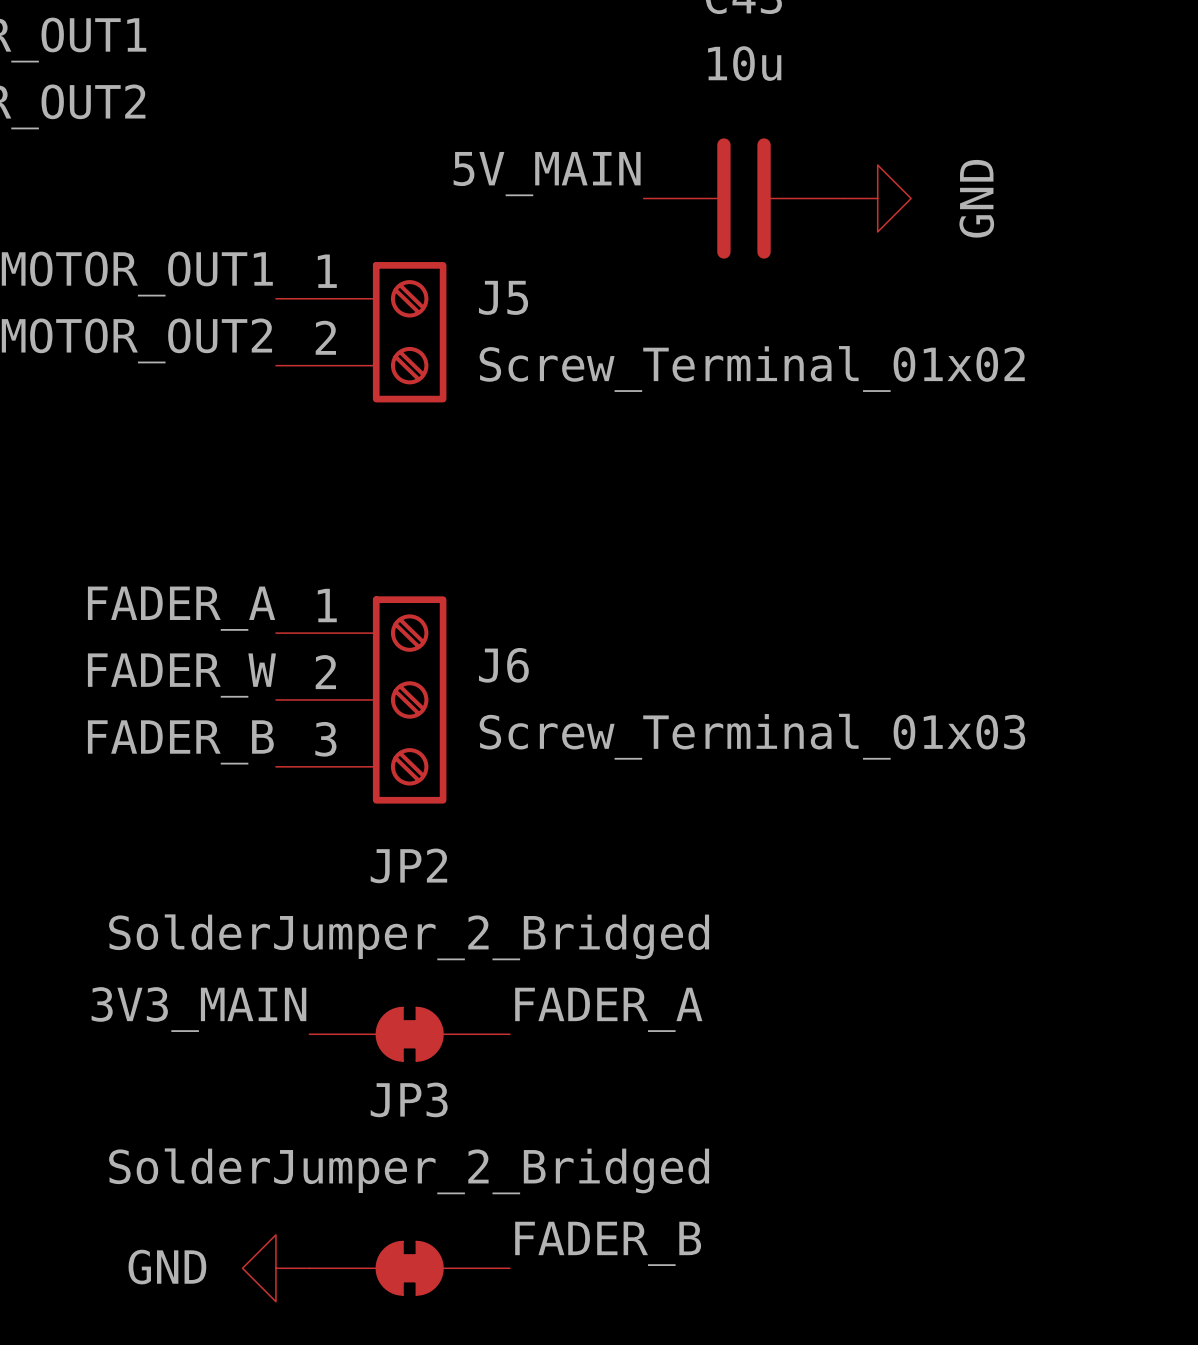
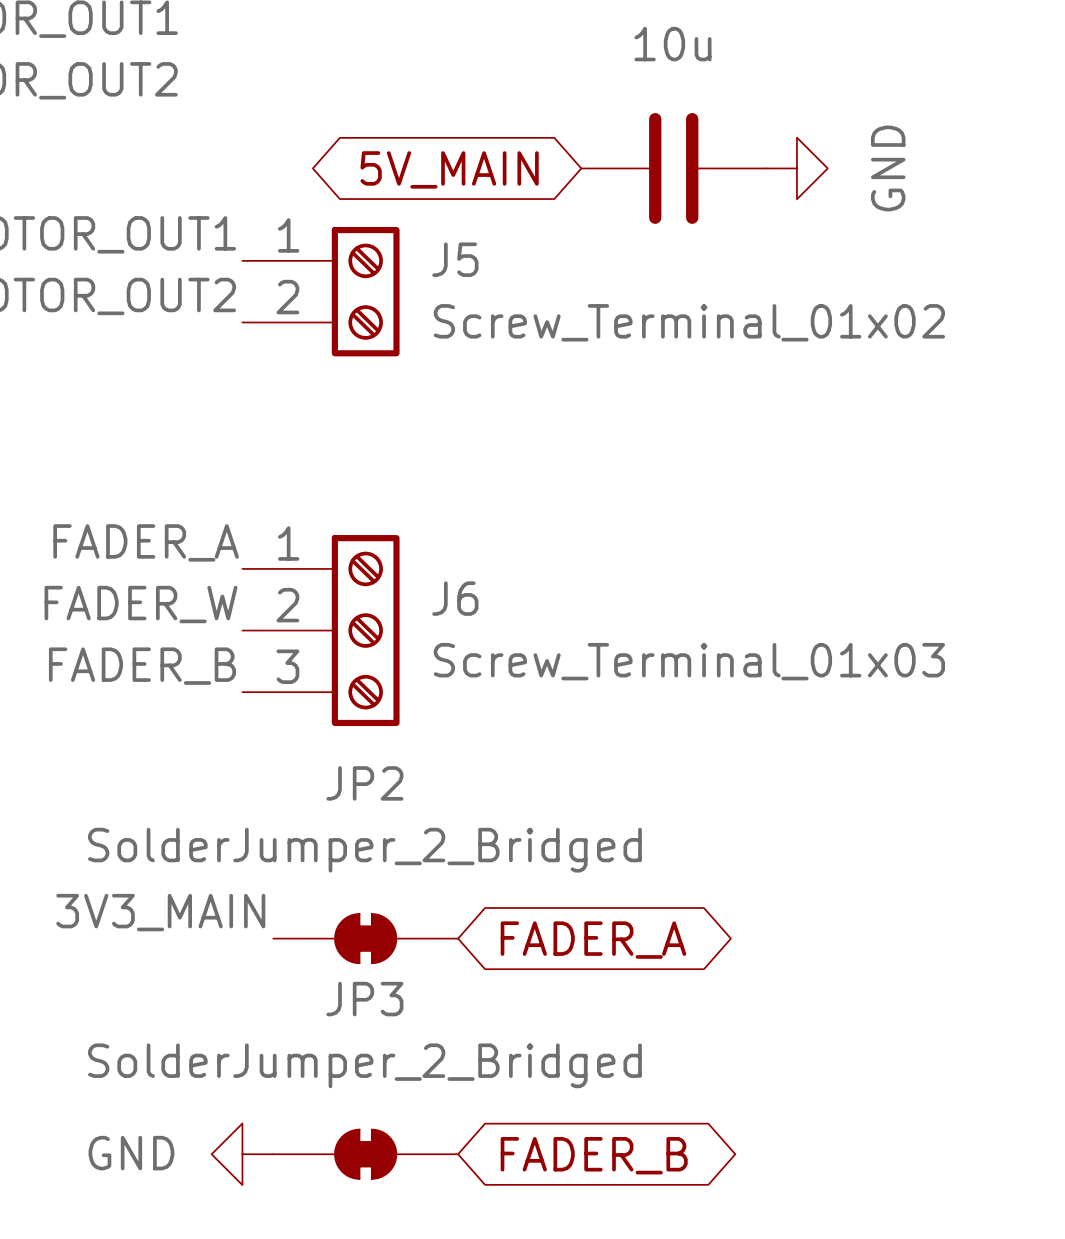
label: 5V_MAIN (547, 174) -> none
global label: none -> 5V_MAIN (449, 169)
label: FADER_A (608, 1009) -> none
global label: none -> FADER_A (593, 940)
label: FADER_B (608, 1243) -> none
global label: none -> FADER_B (594, 1155)

